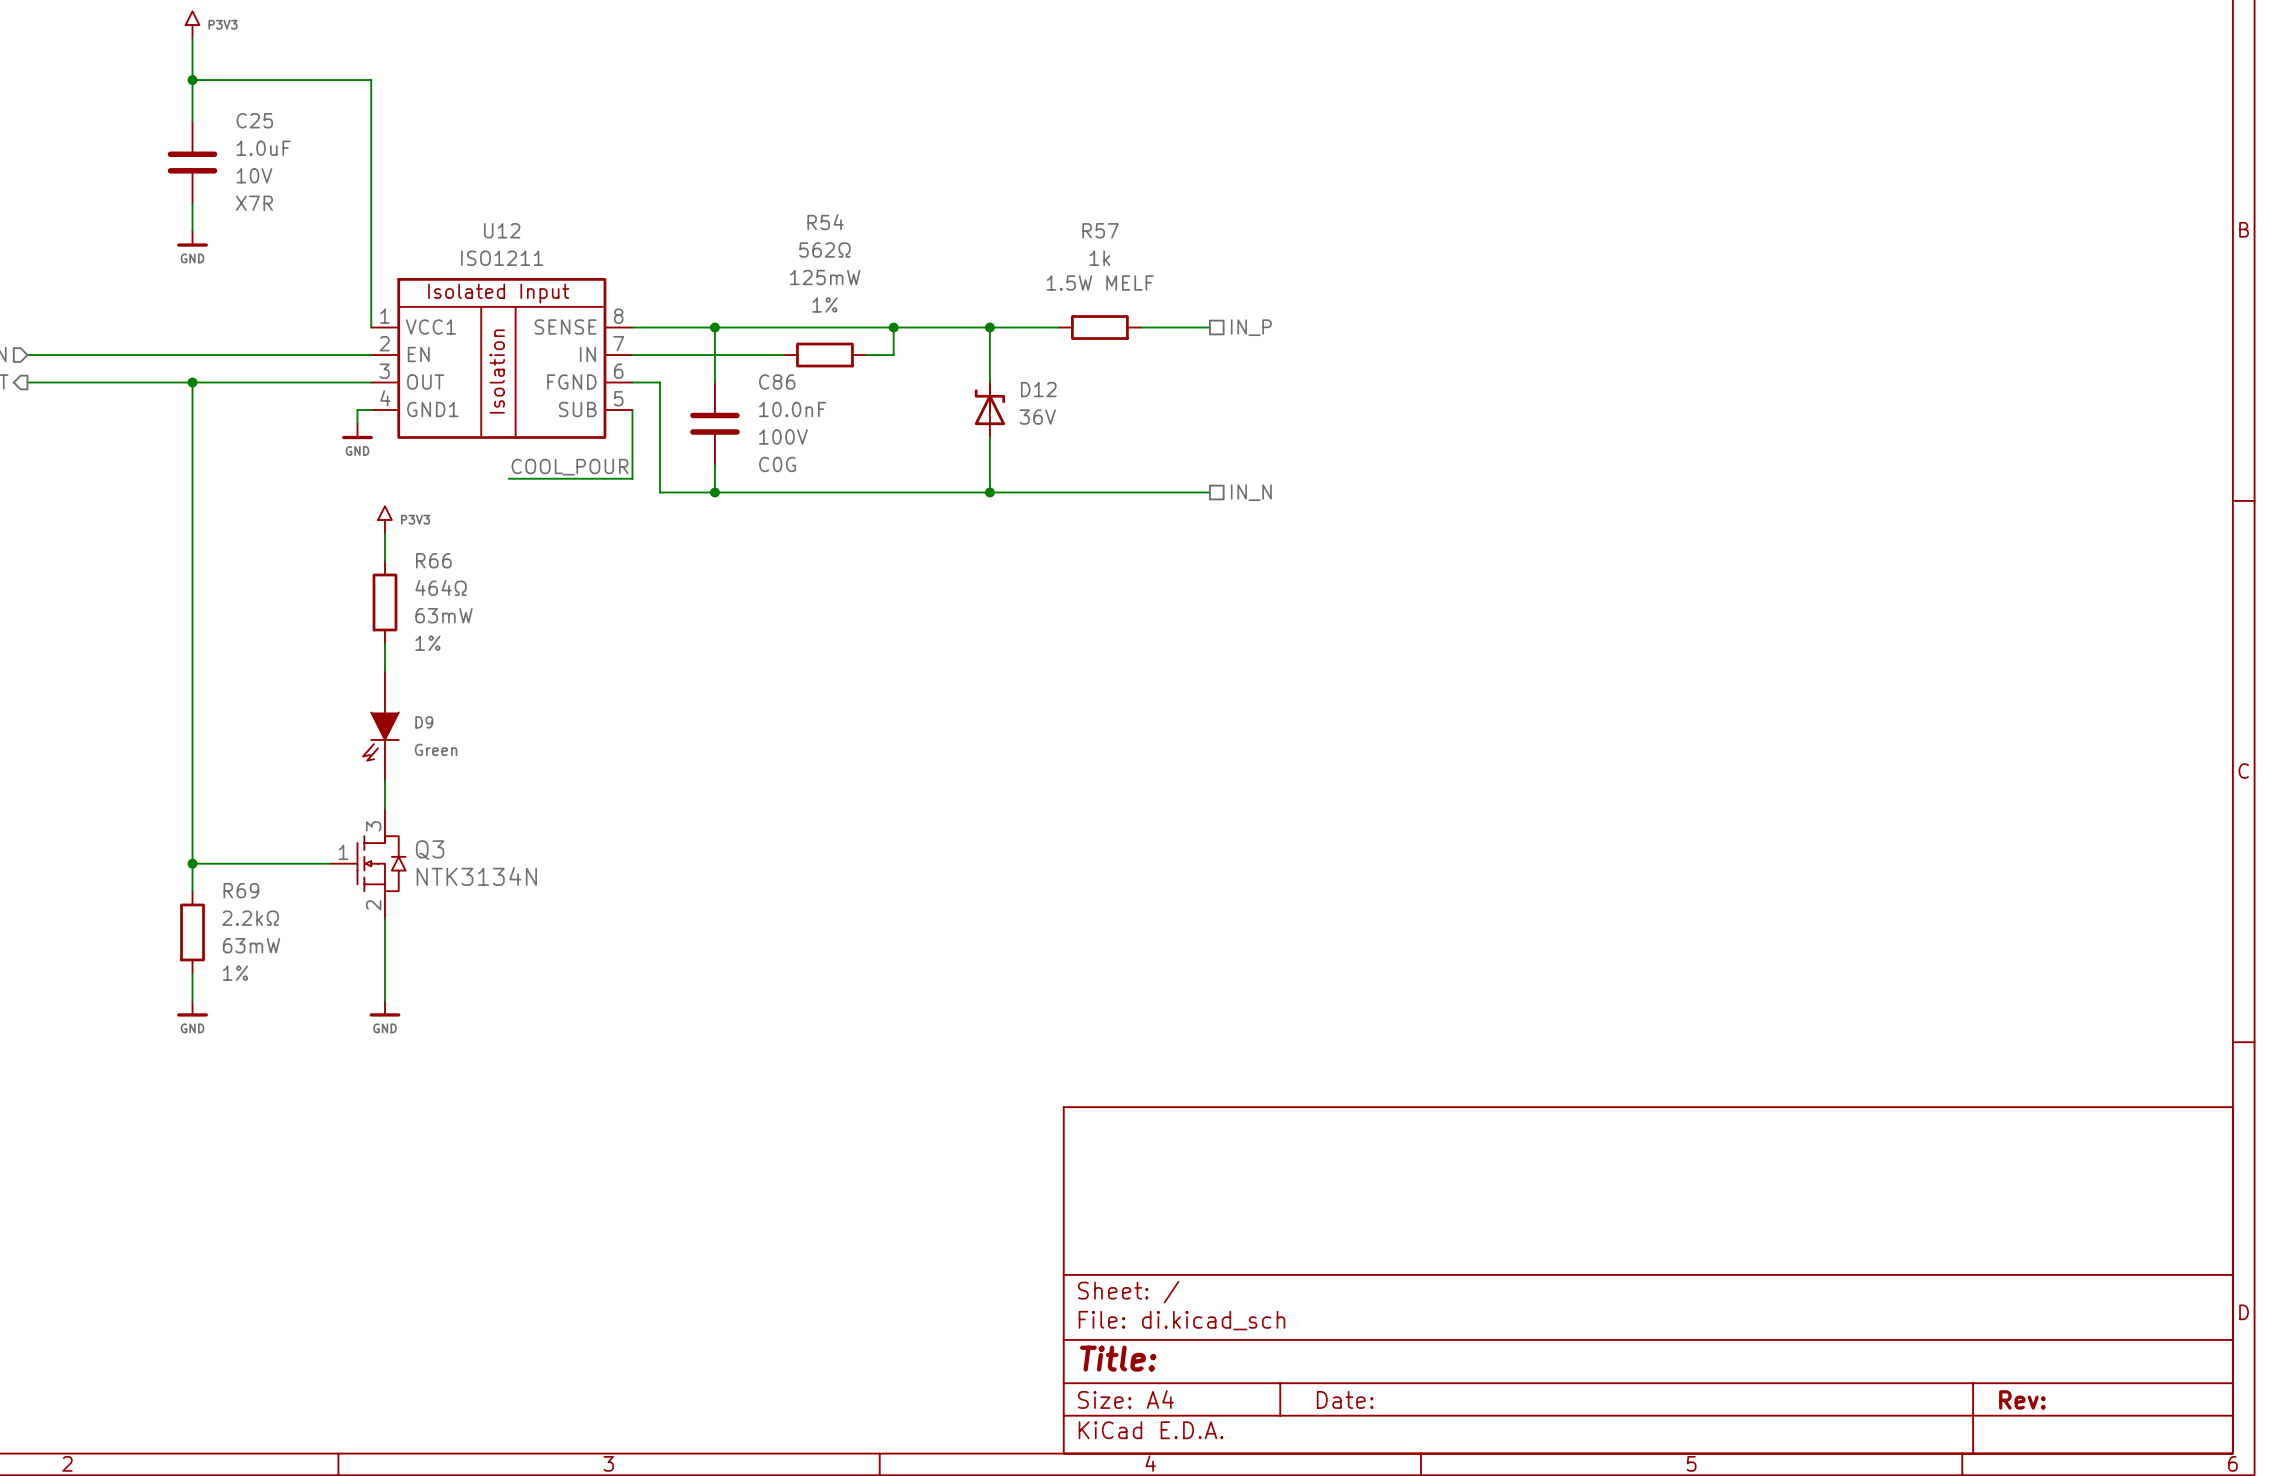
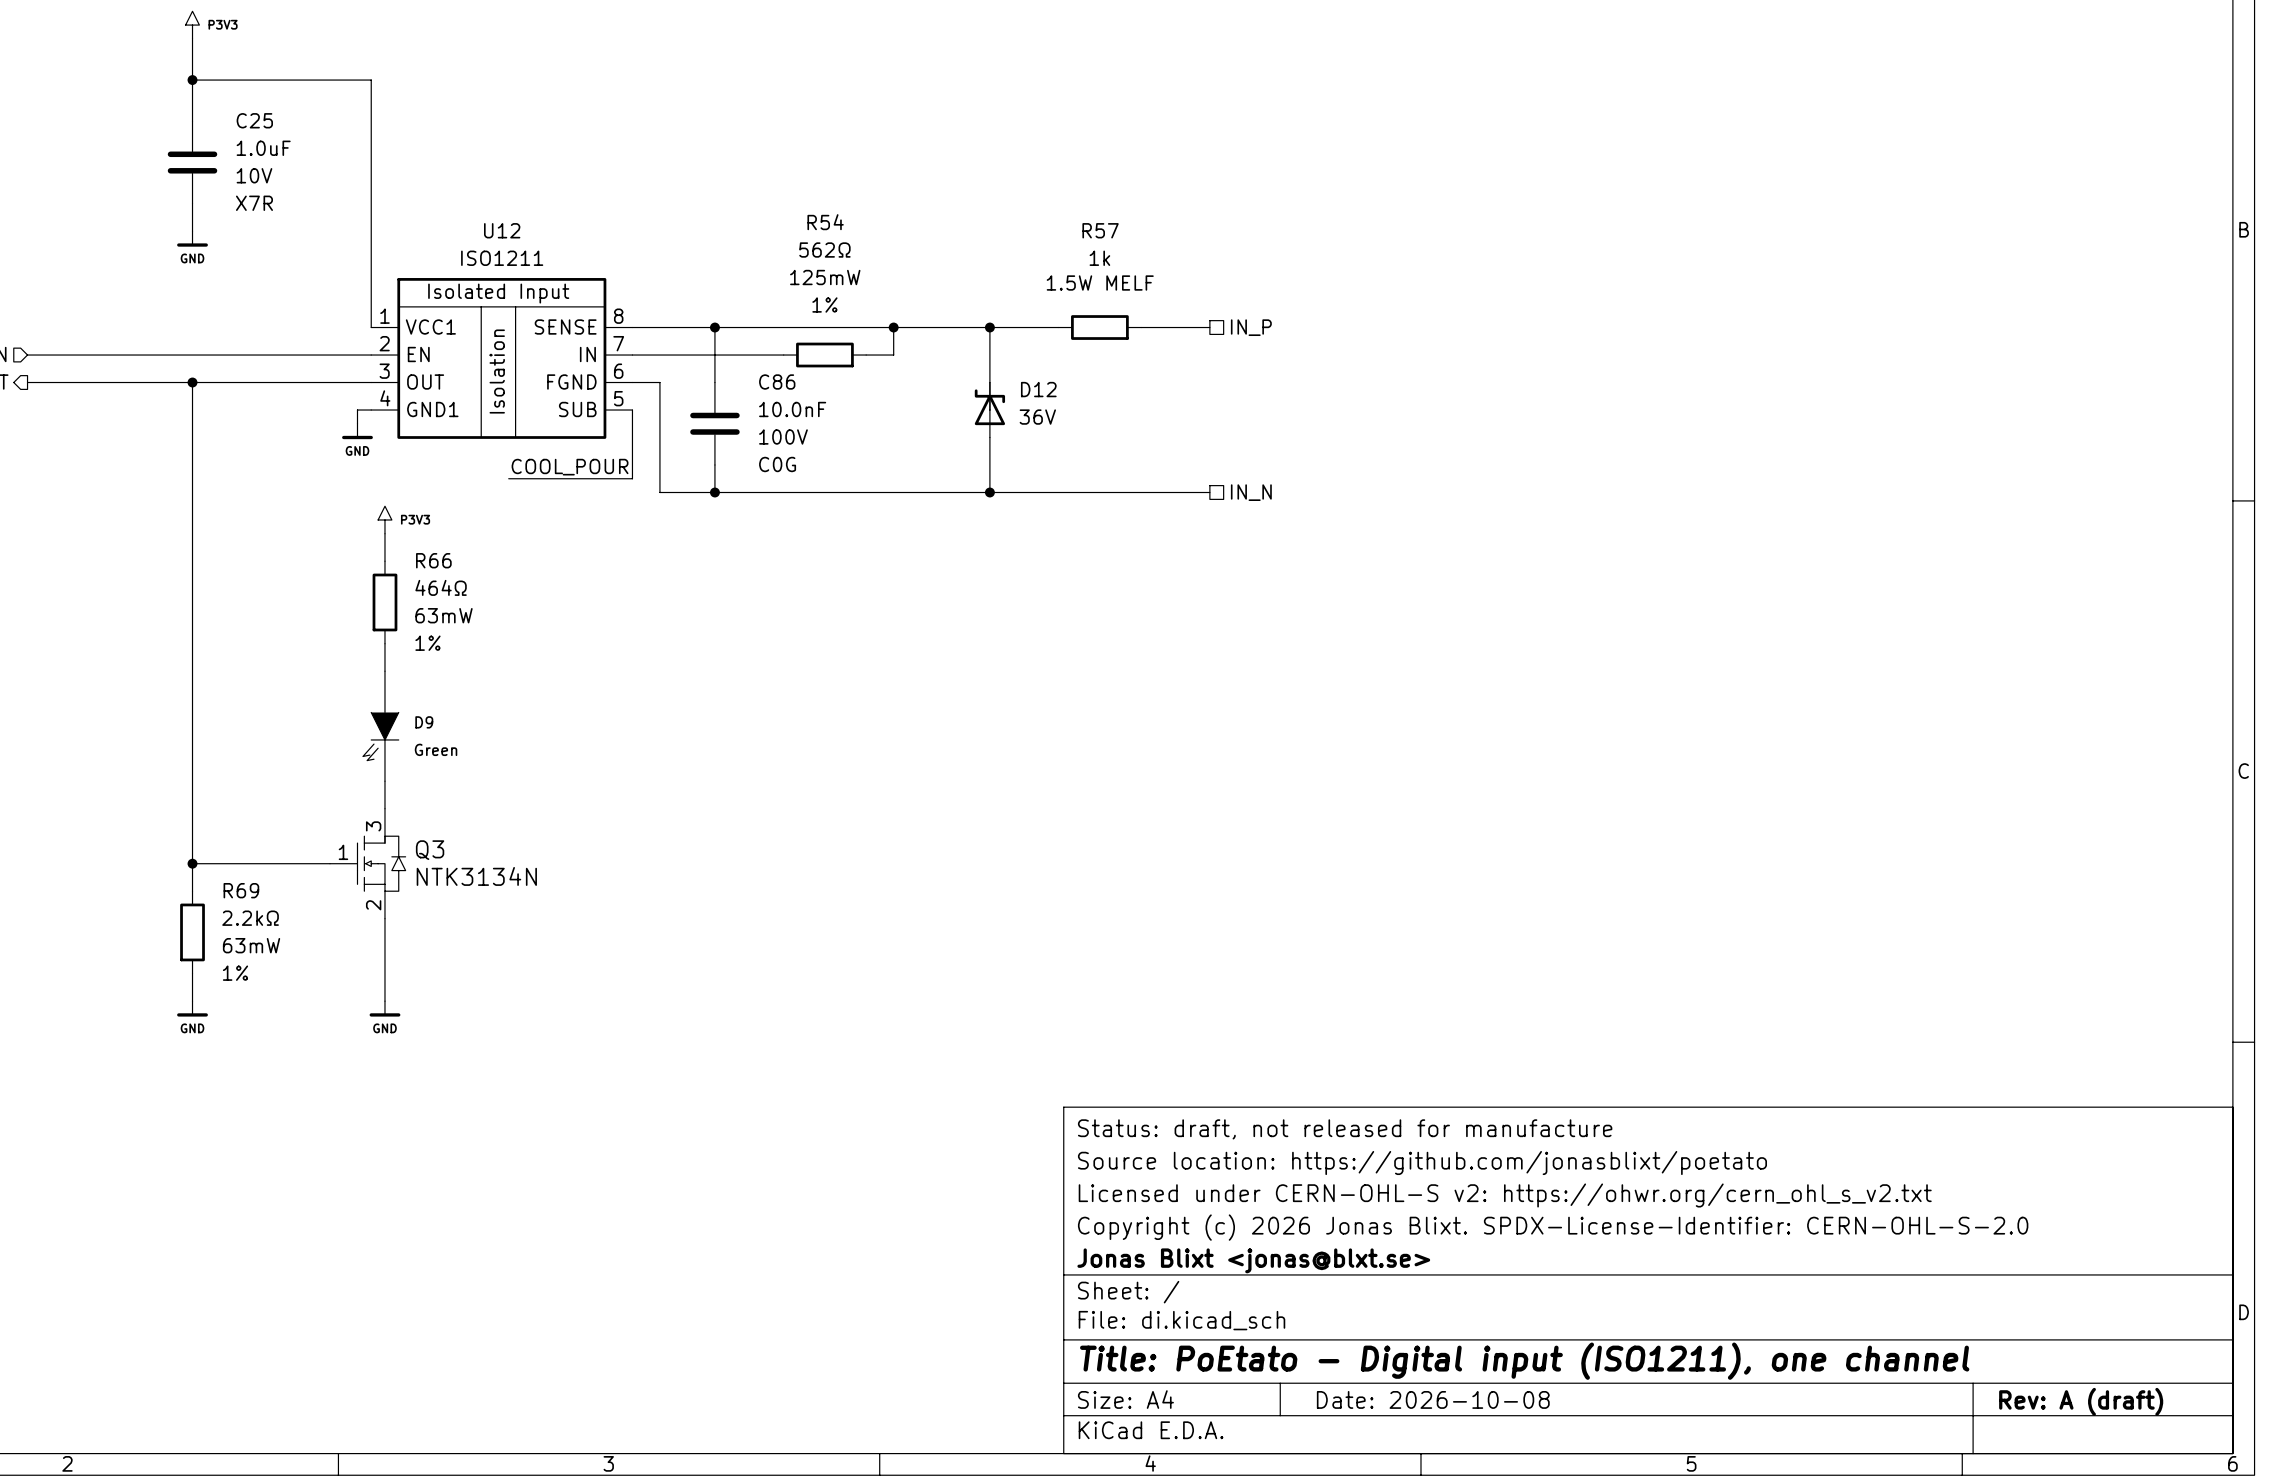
title block: none -> Status: draft, not released for manufacture (1345, 1129)
title block: none -> Source location: https://github.com/jonasblixt/poetato (1422, 1163)
title block: none -> Licensed under CERN-OHL-S v2: https://ohwr.org/cern_ohl_s_v2.txt (1505, 1195)
title block: none -> Copyright (c) 2026 Jonas Blixt. SPDX-License-Identifier: CERN-OHL-S-2.0 (1553, 1227)
title block: none -> Jonas Blixt <jonas@blxt.se> (1253, 1260)
title block: Title: (1118, 1358) -> Title: PoEtato - Digital input (ISO1211), one channel (1524, 1361)
title block: Date: (1345, 1399) -> Date: 2026-10-08 (1433, 1399)
title block: Rev: (2022, 1399) -> Rev: A (draft) (2081, 1401)

